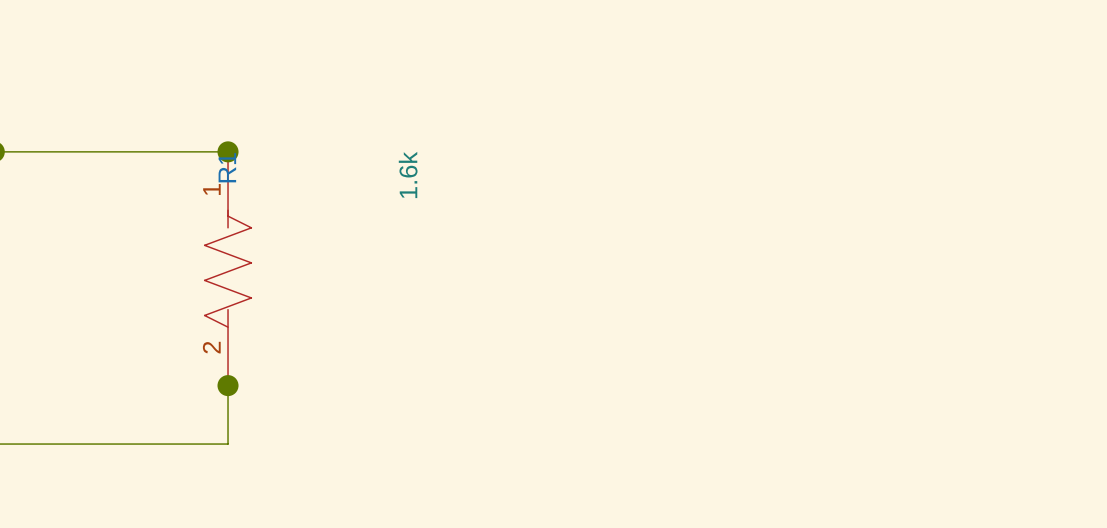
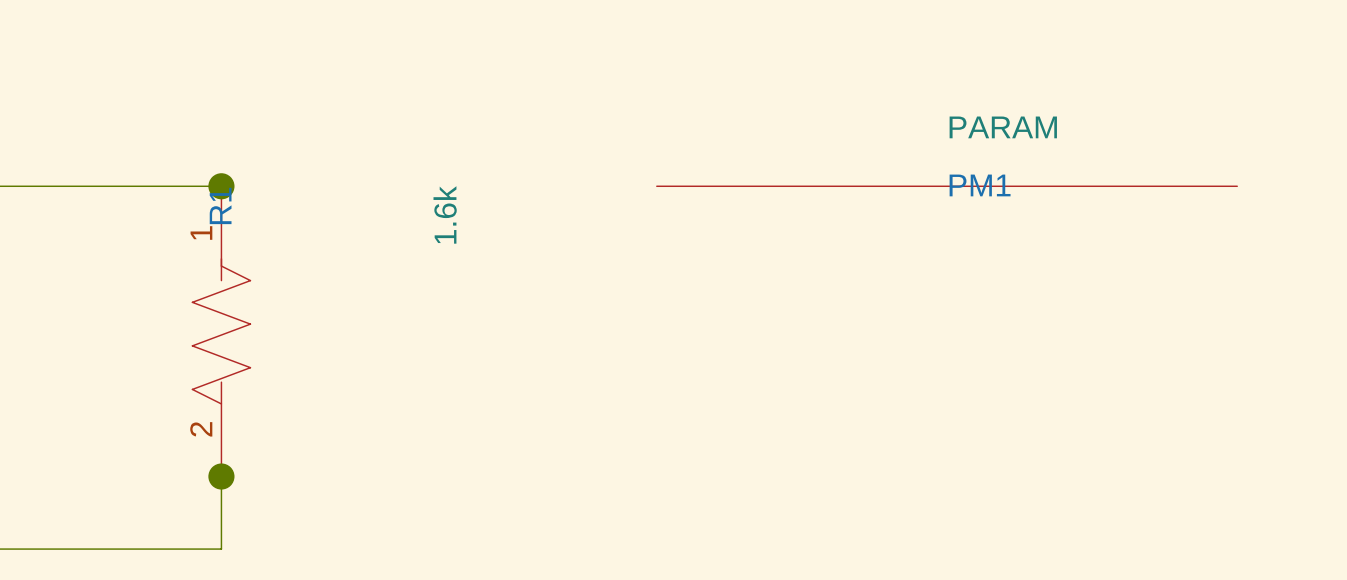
PM1: none -> PARAM (947, 186)

